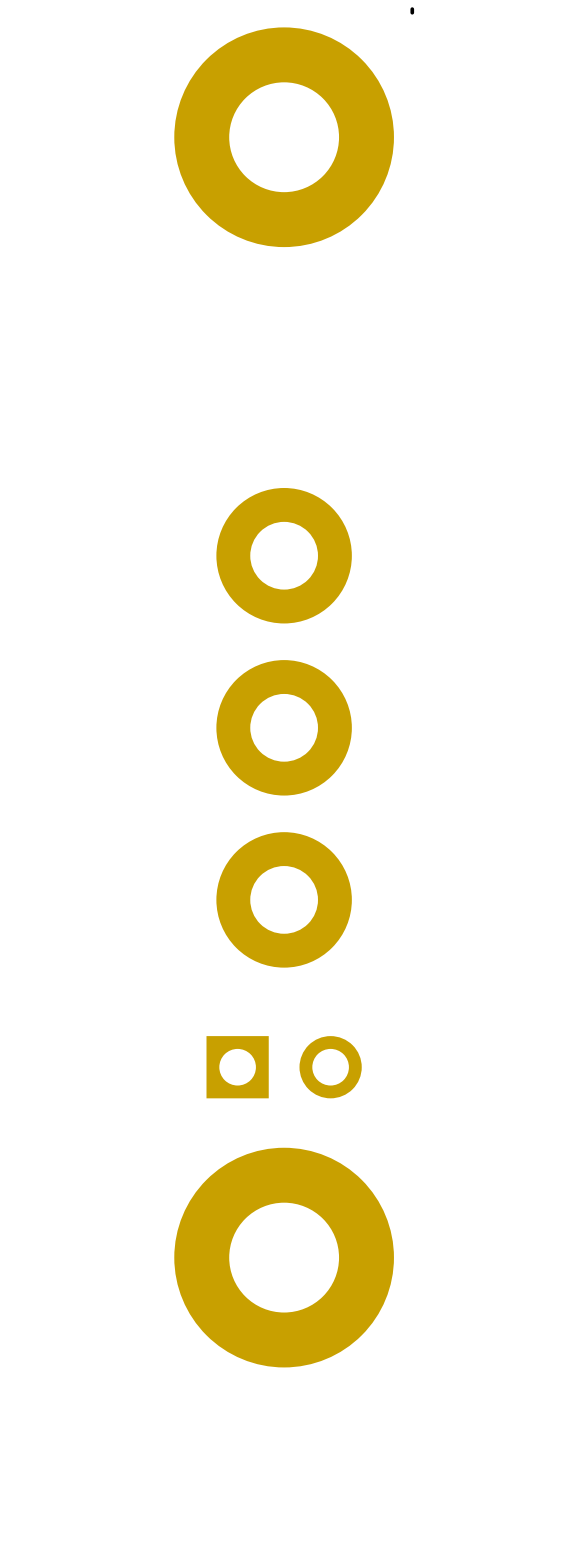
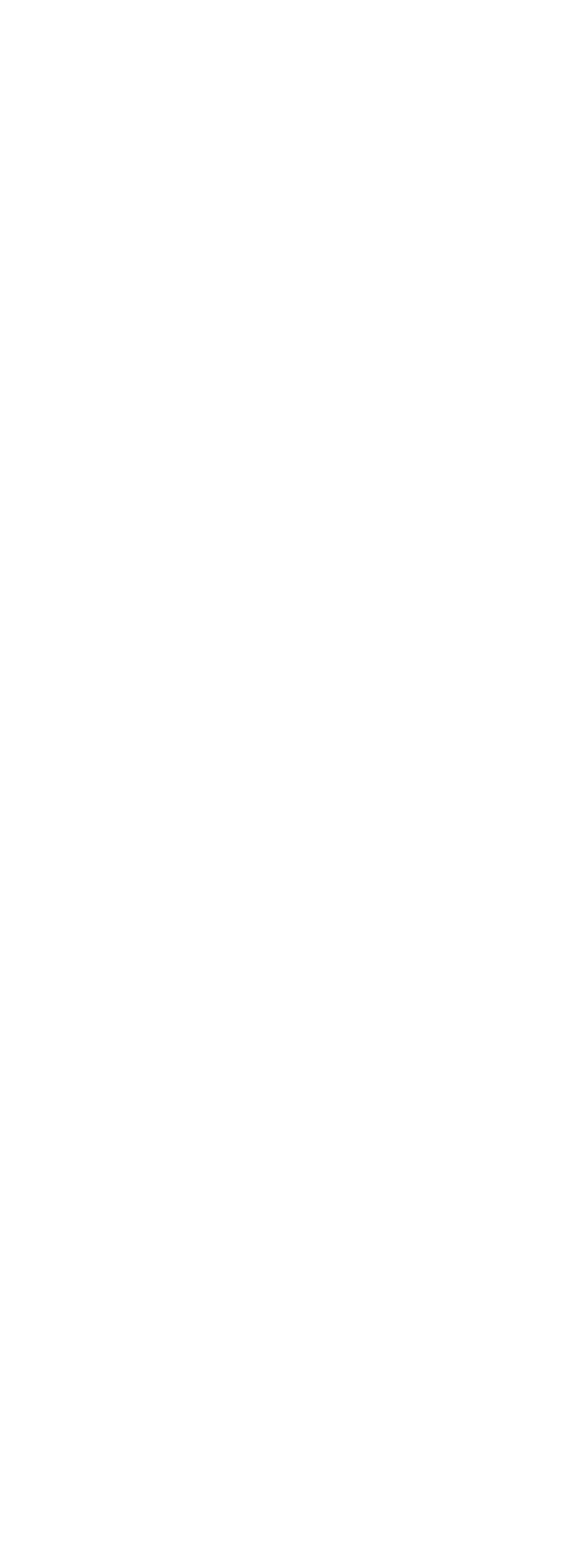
board edge: (412, 9) (412, 12) -> none
part: (284, 137) -> none
part: (284, 727) -> none
part: (284, 1067) -> none
part: (284, 1257) -> none

